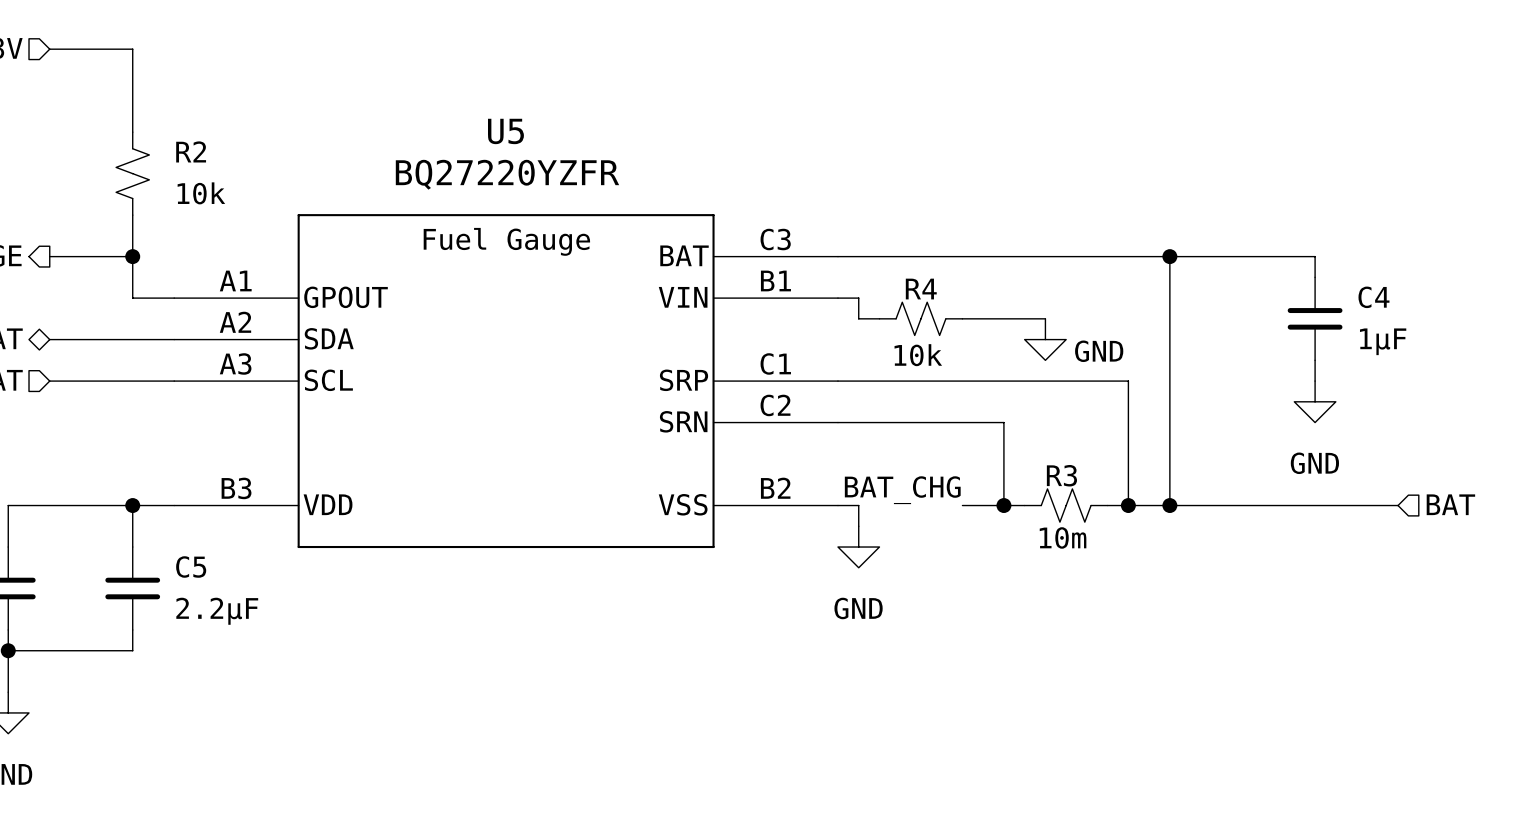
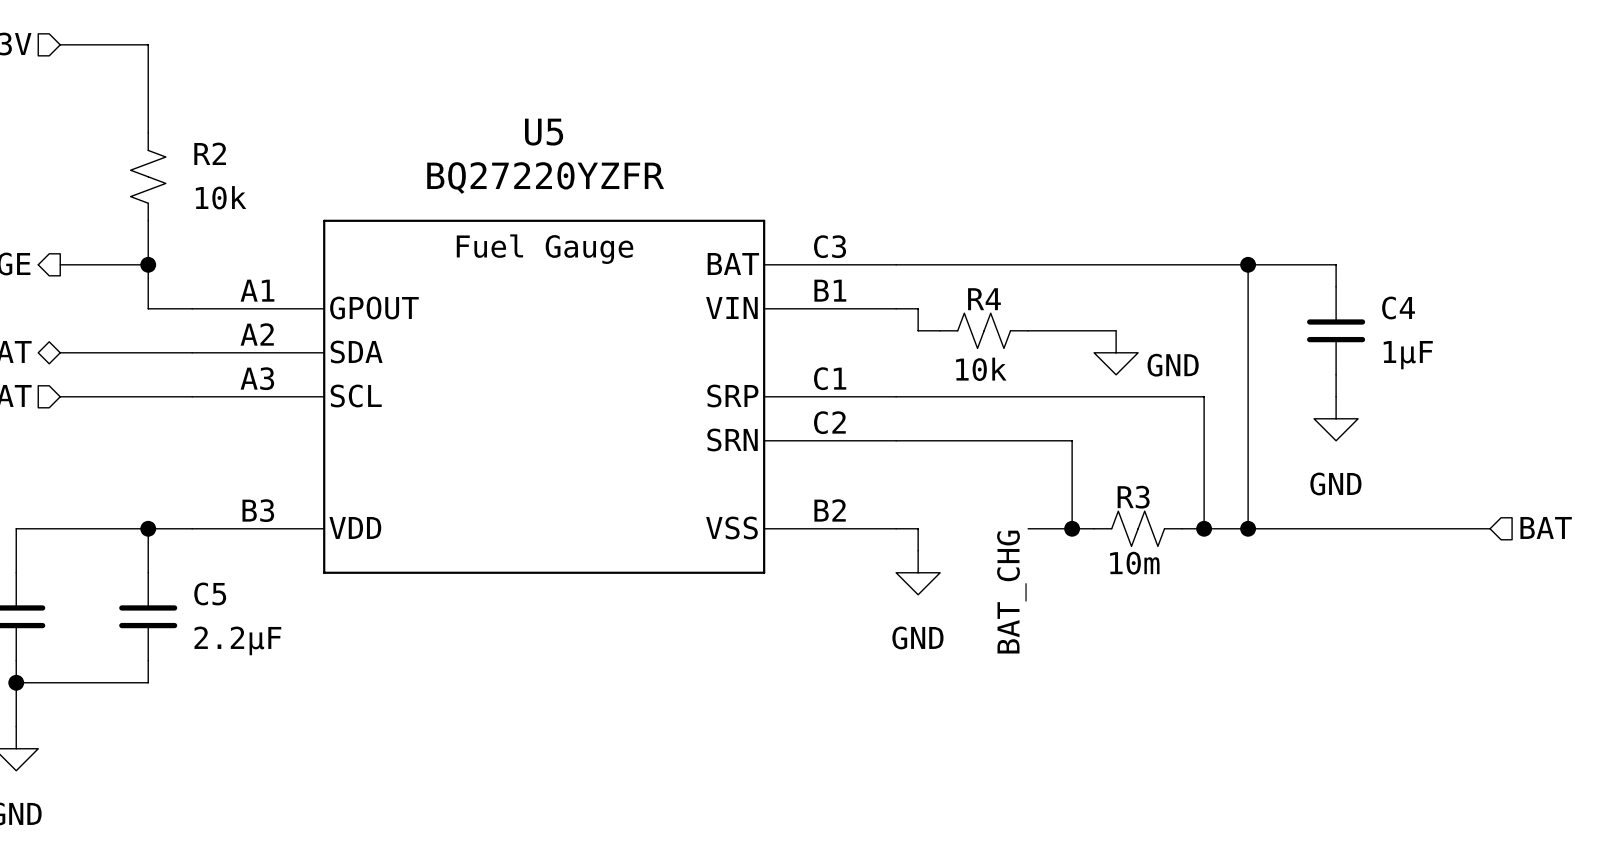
wire: (1252, 256) (1315, 256) (1315, 277) -> (1336, 264) (1336, 286)
C4 position: (1315, 318) -> (1336, 330)
wire: (1315, 360) (1315, 381) -> (1336, 374) (1336, 396)
power symbol position: GND (1315, 401) -> GND (1336, 418)
label rotation: 0° (902, 490) -> 90° counterclockwise (1011, 592)

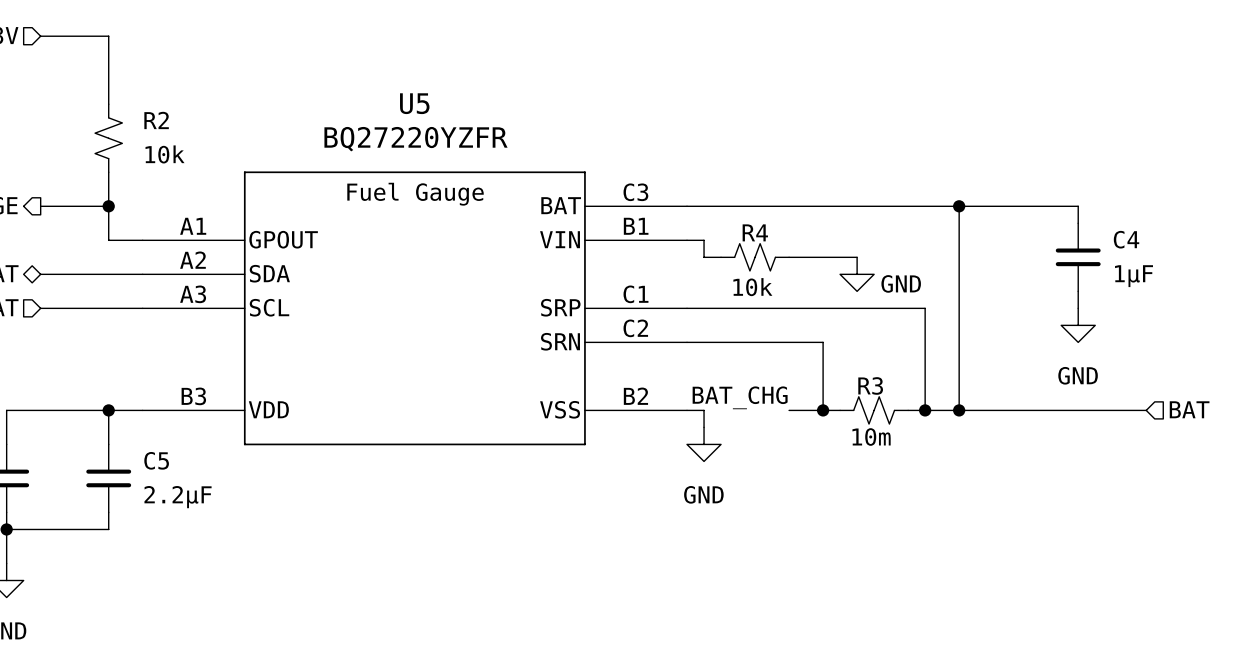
wire: (1336, 264) (1336, 286) -> (1027, 206) (1078, 206) (1078, 223)
C4 position: (1336, 330) -> (1078, 257)
wire: (1336, 374) (1336, 396) -> (1078, 291) (1078, 308)
power symbol position: GND (1336, 418) -> GND (1078, 325)
label rotation: 0° (1011, 592) -> 90° clockwise (740, 397)

